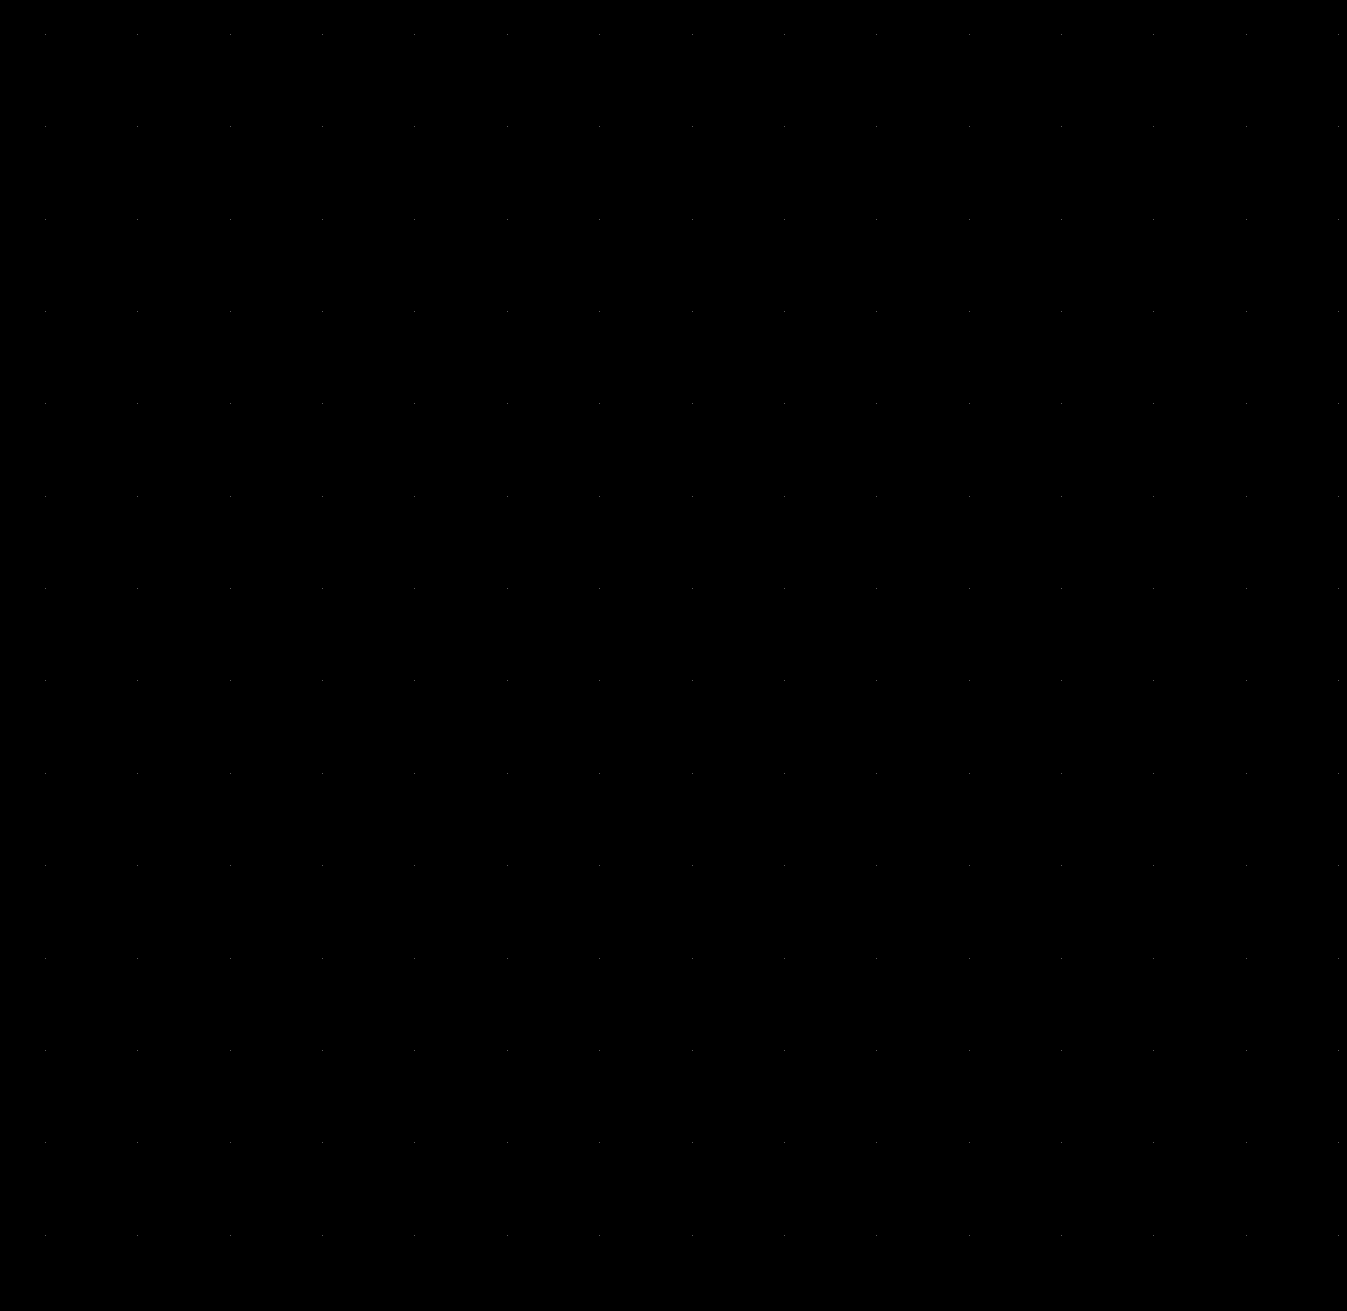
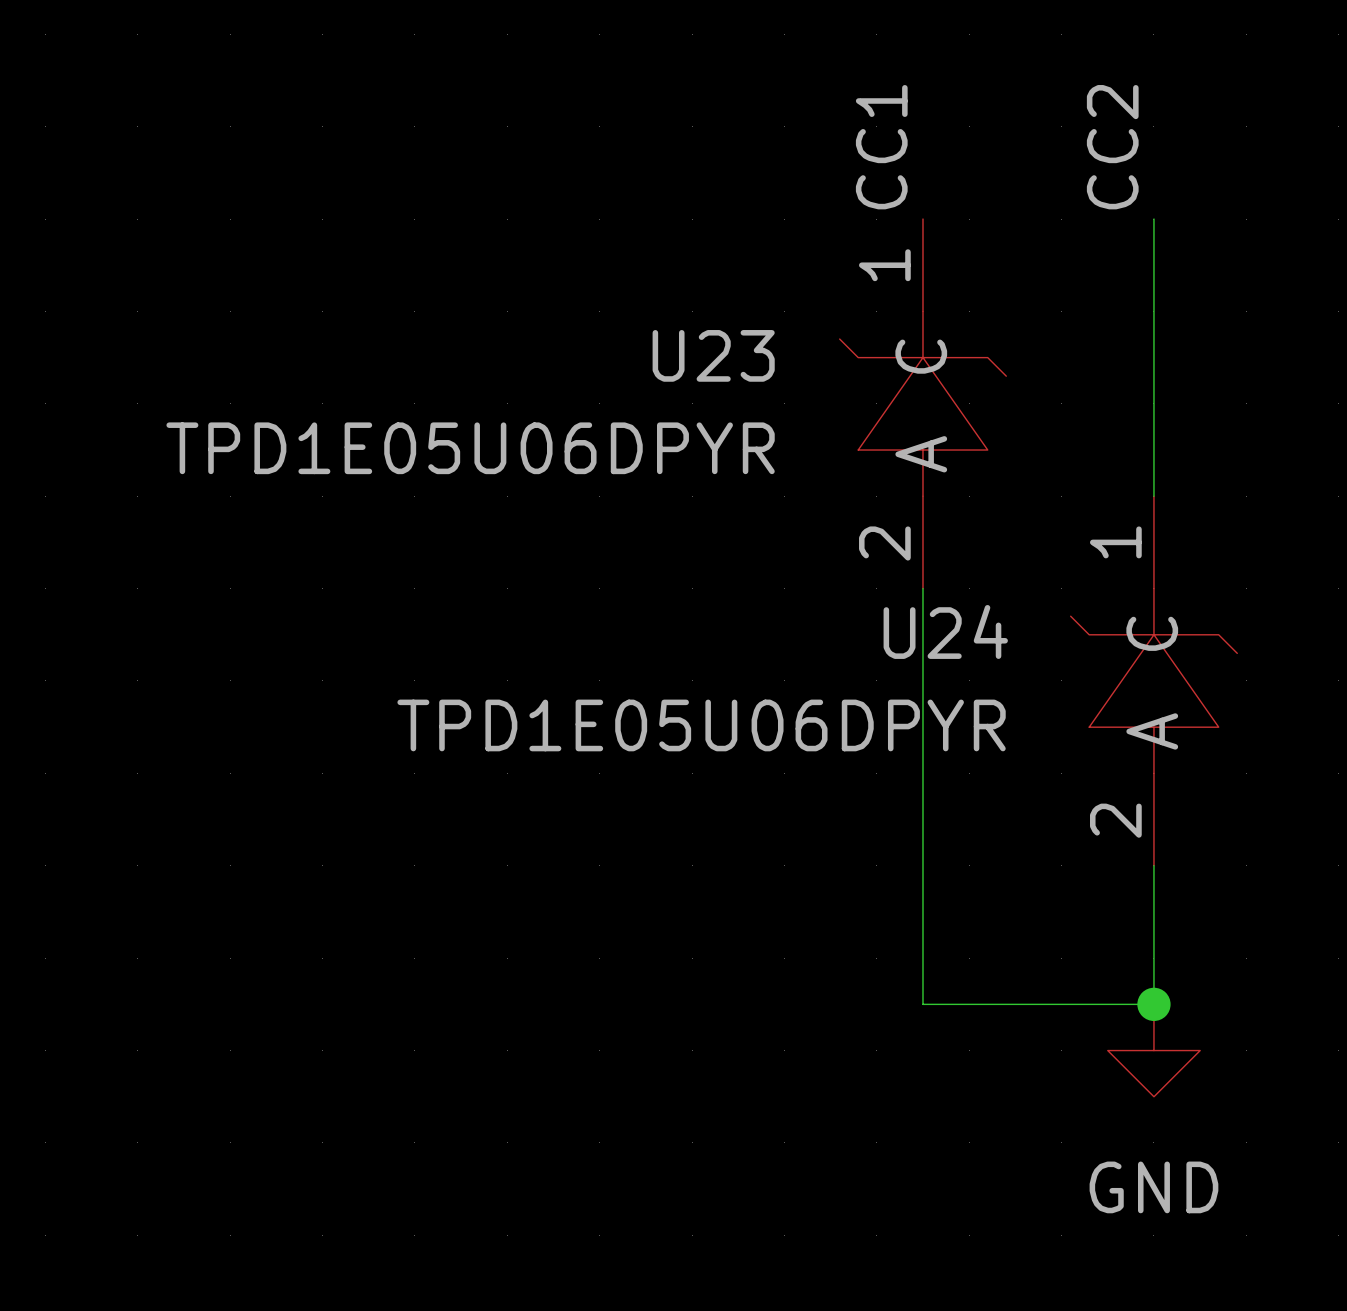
label: none -> CC1 (881, 147)
label: none -> CC2 (1112, 147)
wire: none -> (1153, 219) (1153, 496)
U23: none -> TPD1E05U06DPYR (922, 403)
wire: none -> (922, 588) (922, 1004) (1153, 1004) (1153, 865)
U24: none -> TPD1E05U06DPYR (1153, 680)
junction: none -> (1153, 1004)
power symbol: none -> GND (1153, 1050)

